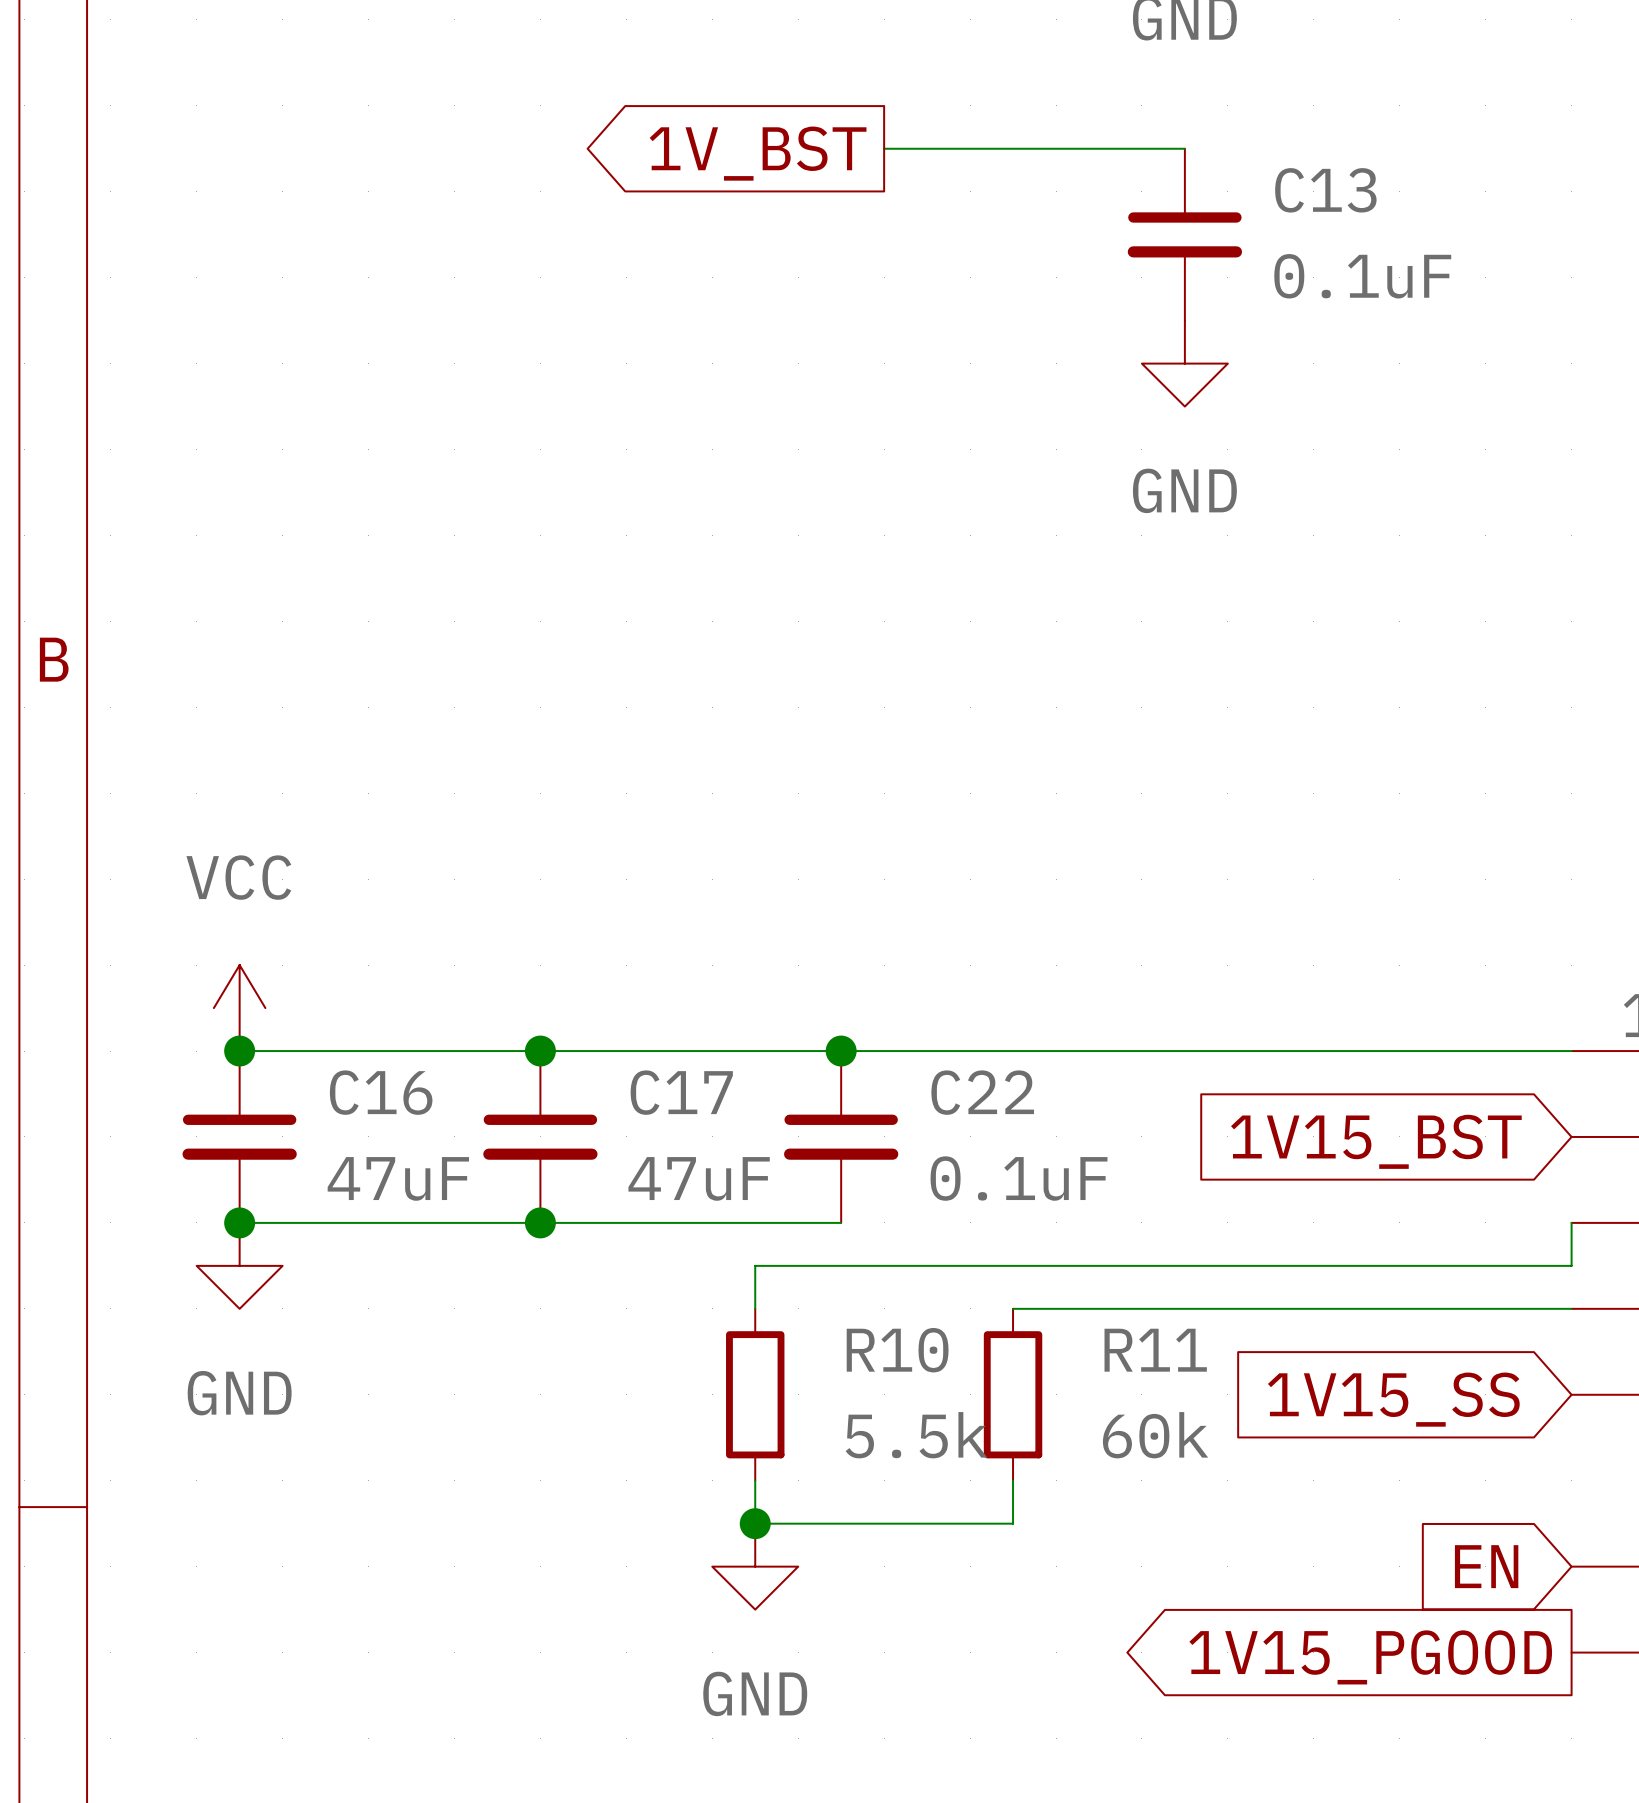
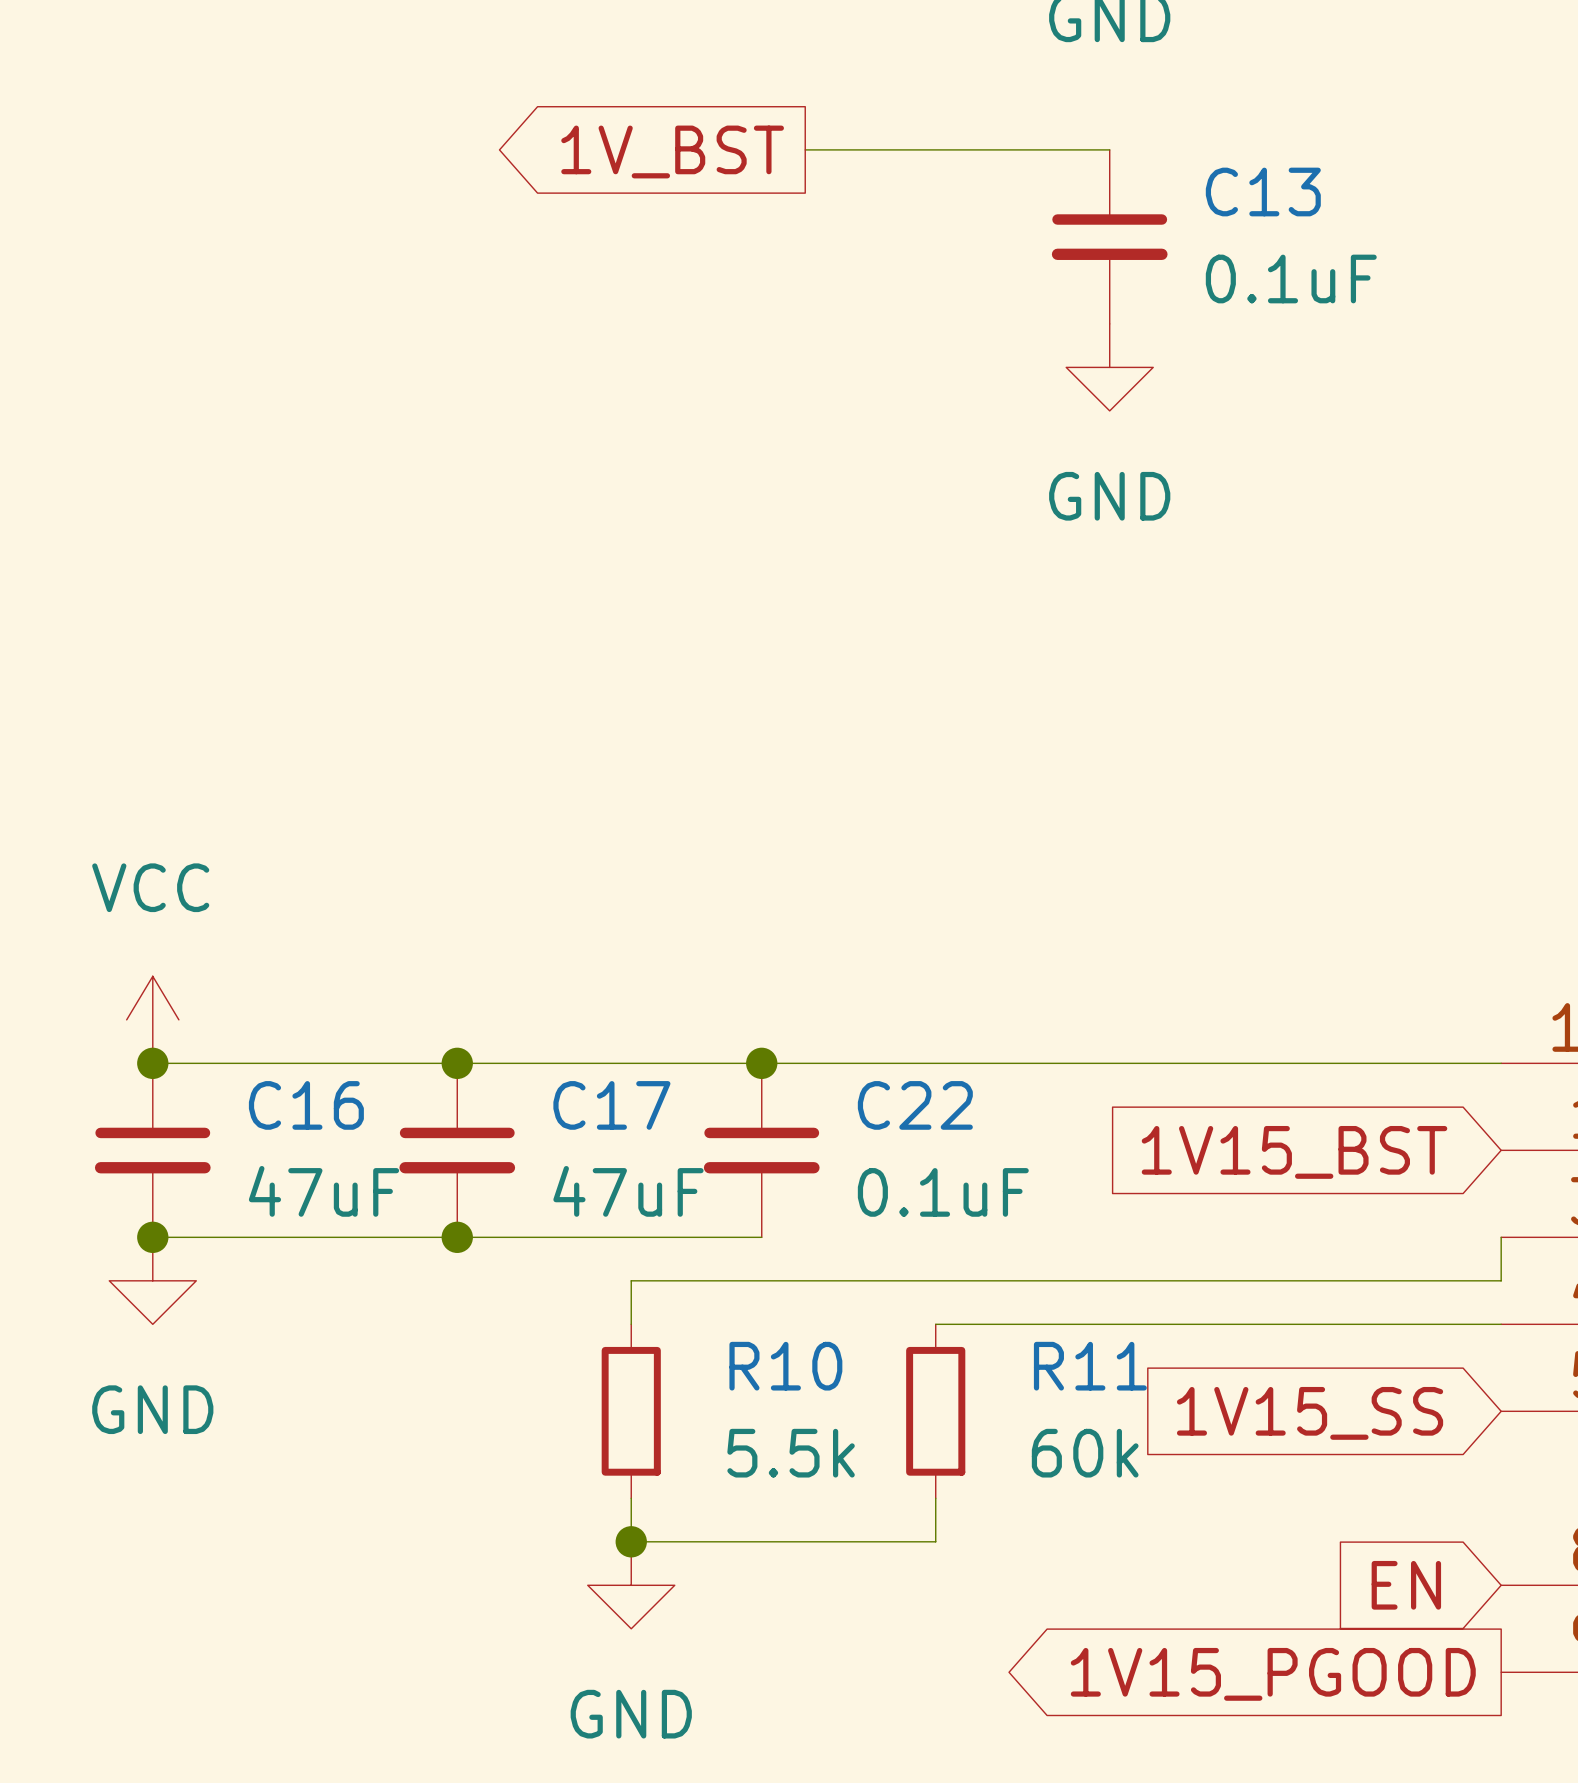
wire: (755, 1265) (755, 1308) -> (674, 1280) (631, 1280) (631, 1324)
R10 position: (755, 1394) -> (631, 1411)
wire: (755, 1480) (755, 1523) -> (631, 1498) (631, 1541) (674, 1541)
junction position: (755, 1523) -> (631, 1541)
power symbol position: GND (755, 1566) -> GND (631, 1585)

